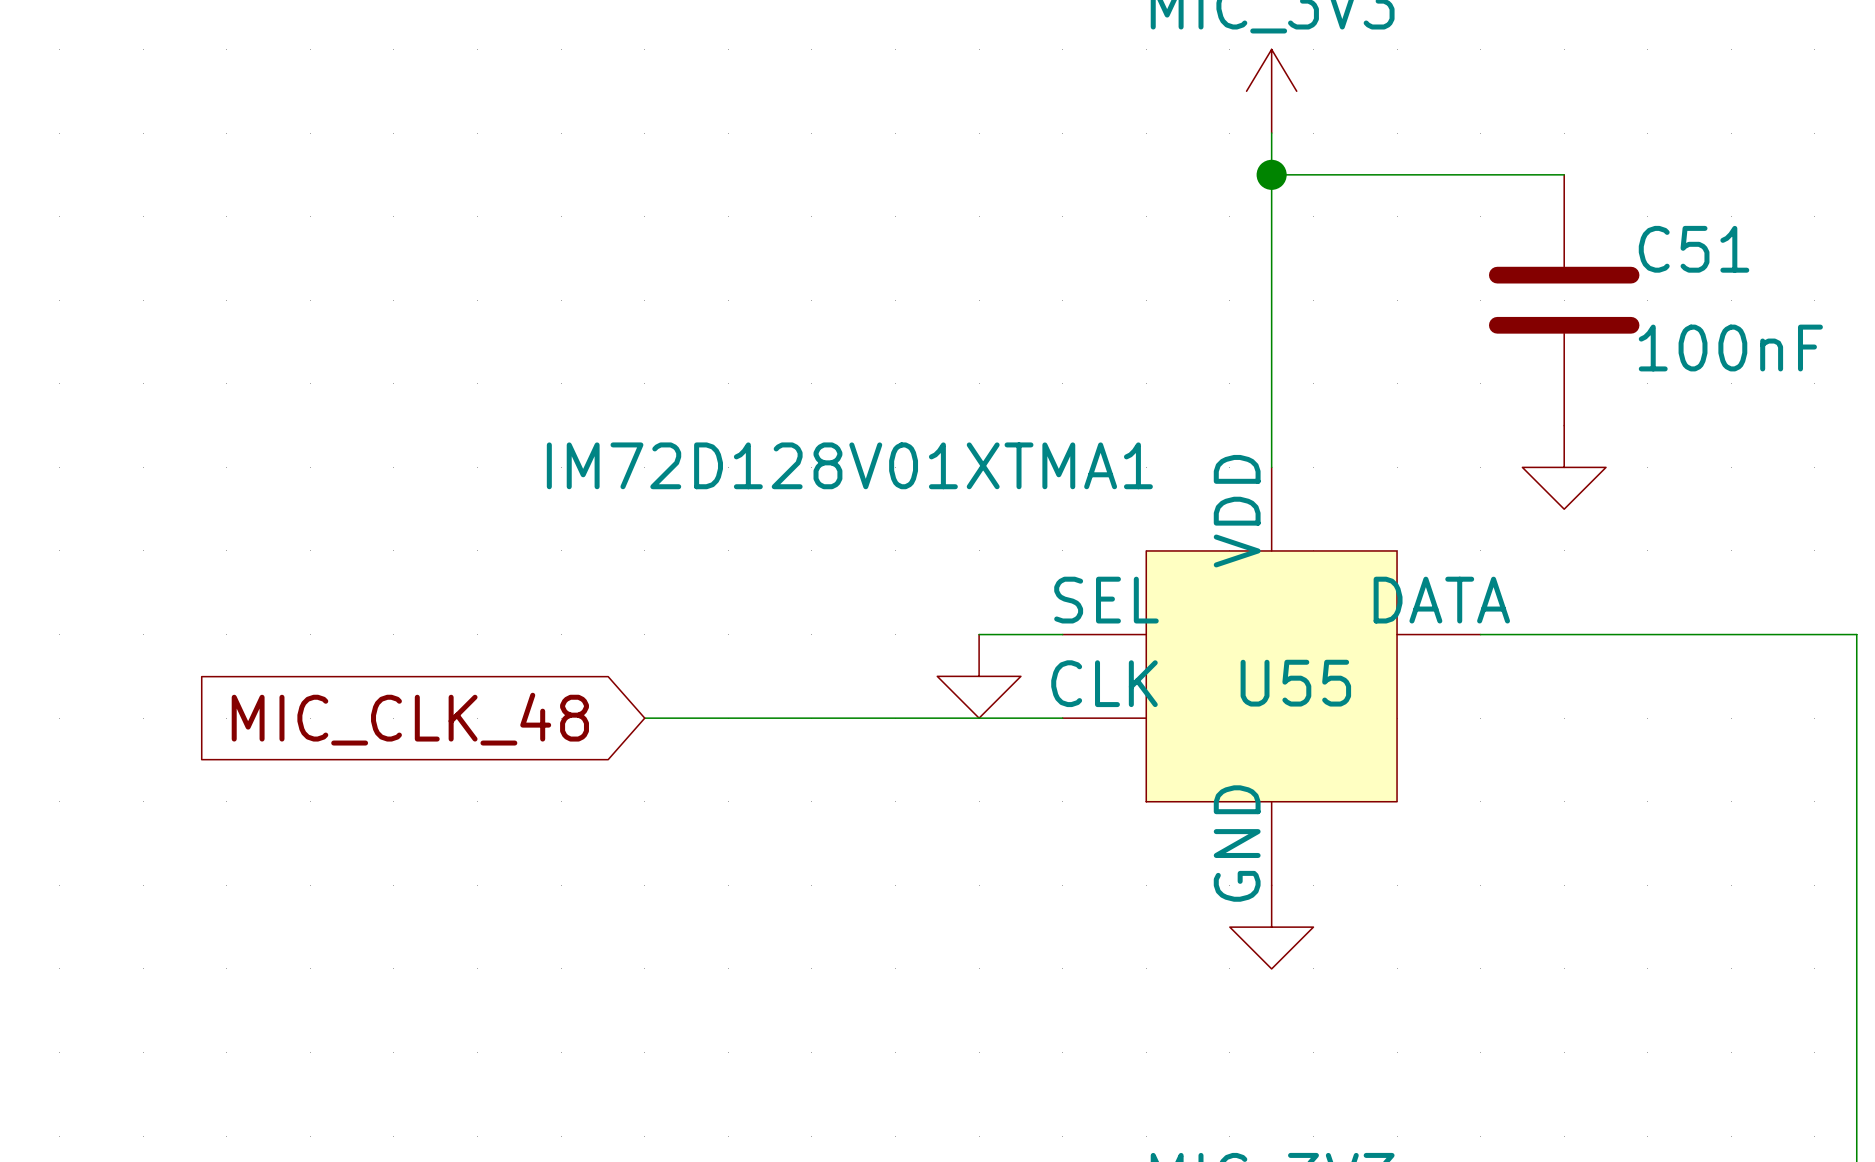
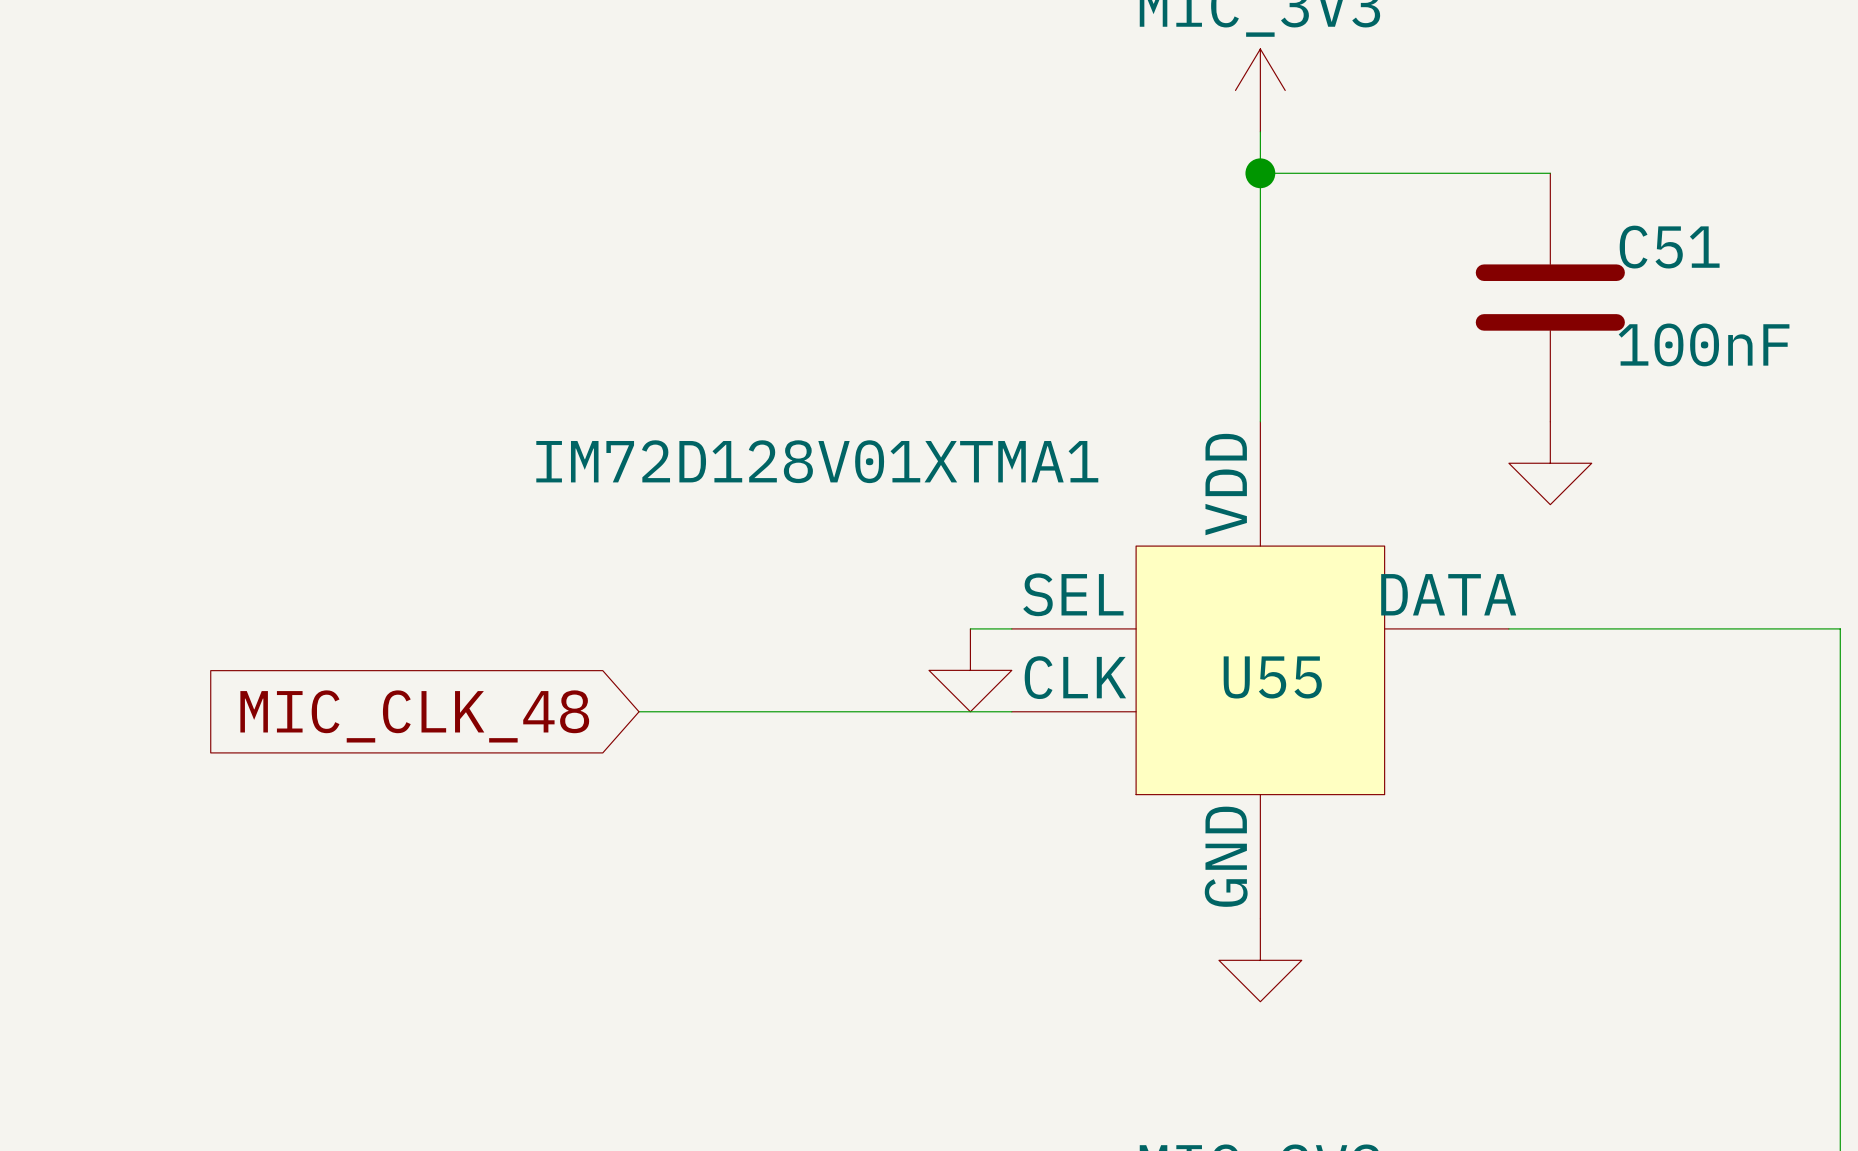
U55 symbol: [1062, 467, 1481, 886] -> [1011, 421, 1509, 919]
power symbol position: (1271, 927) -> (1260, 960)

